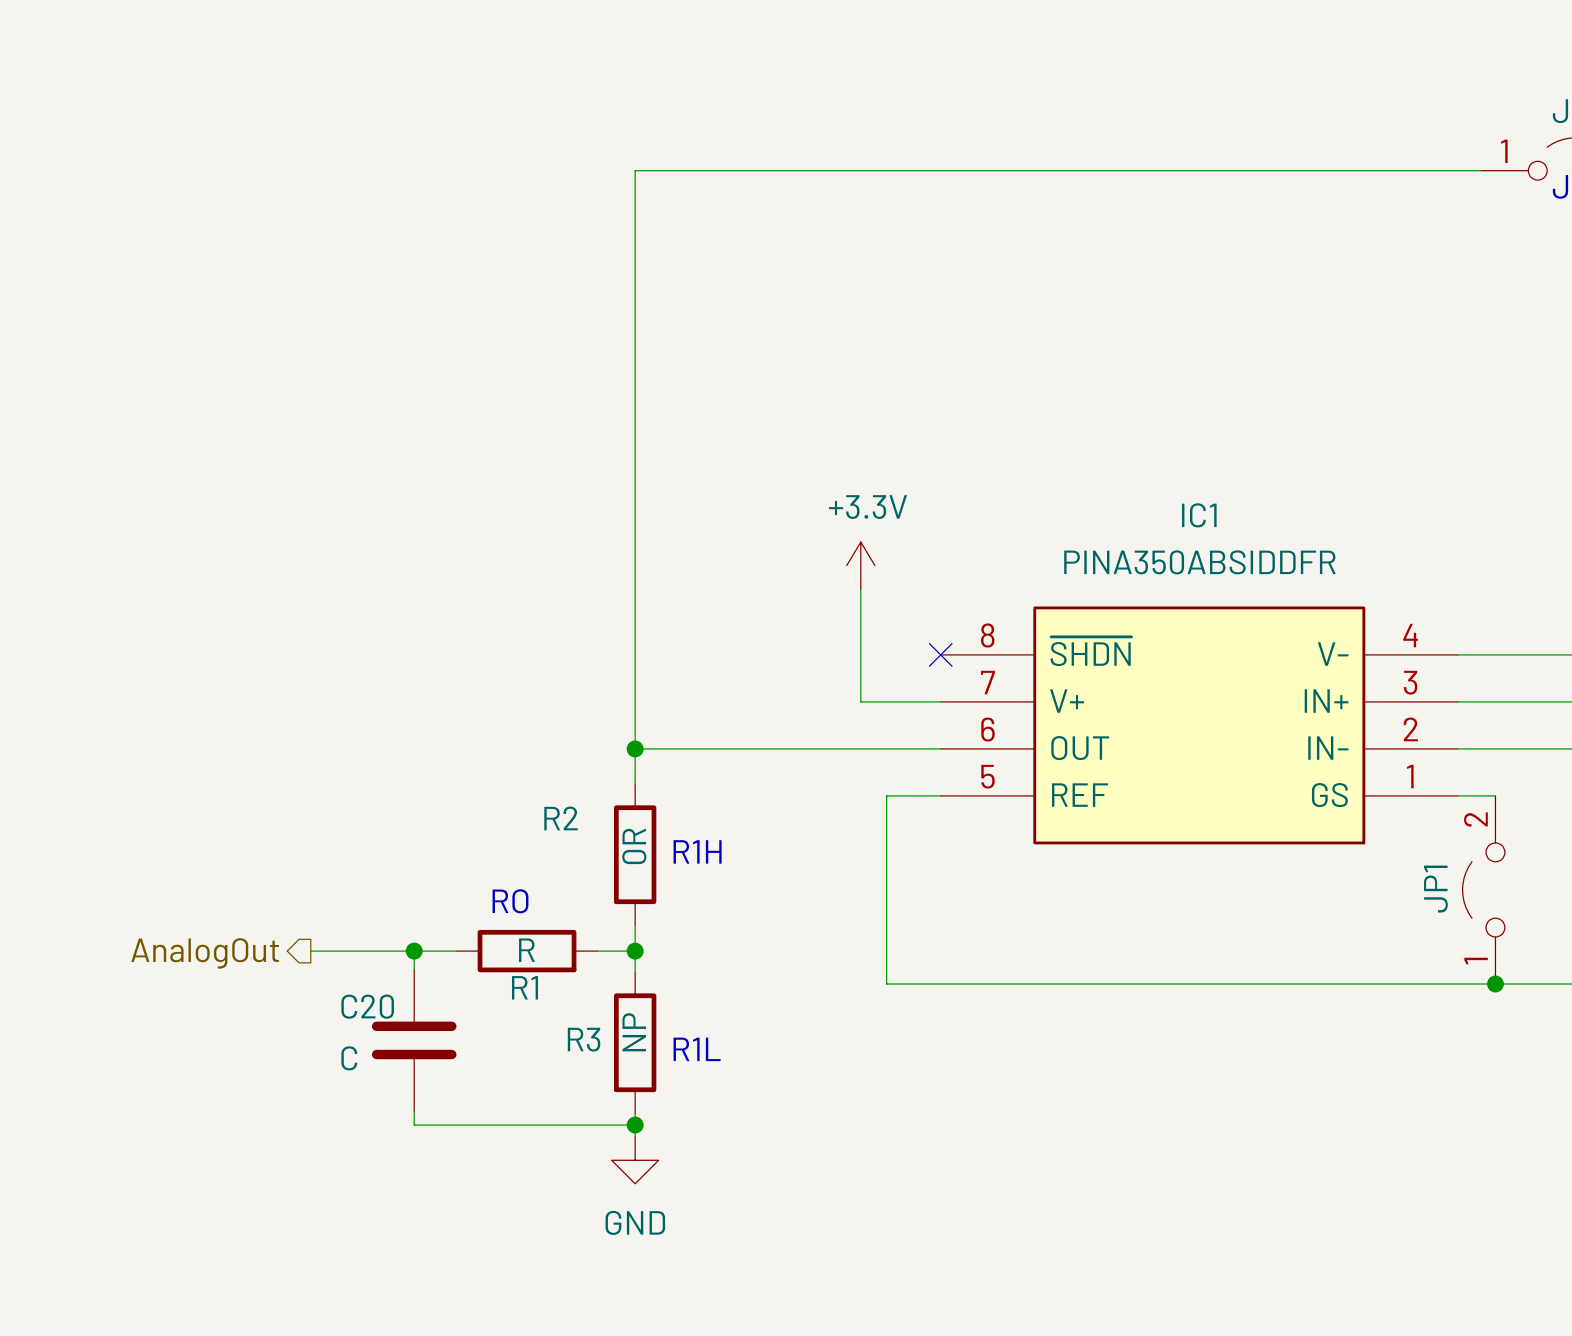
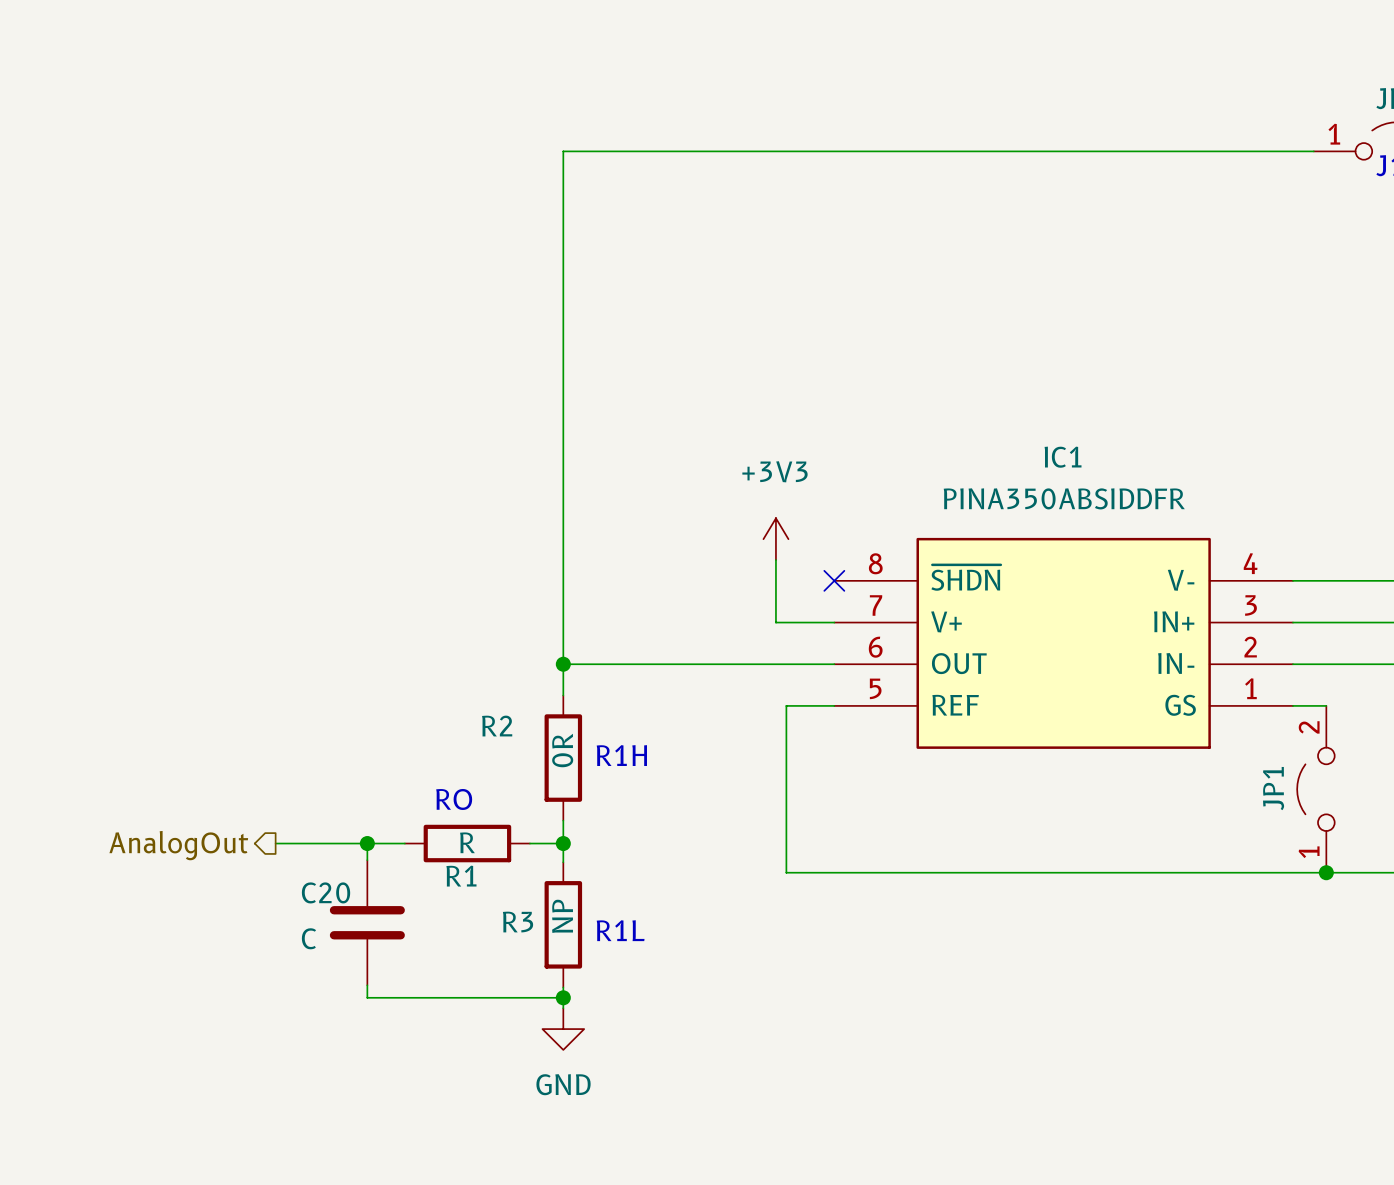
power symbol: +3.3V (860, 565) -> none
wire: (860, 589) (860, 701) (874, 701) -> (775, 560) (775, 622)
power symbol: none -> +3V3 (775, 539)

